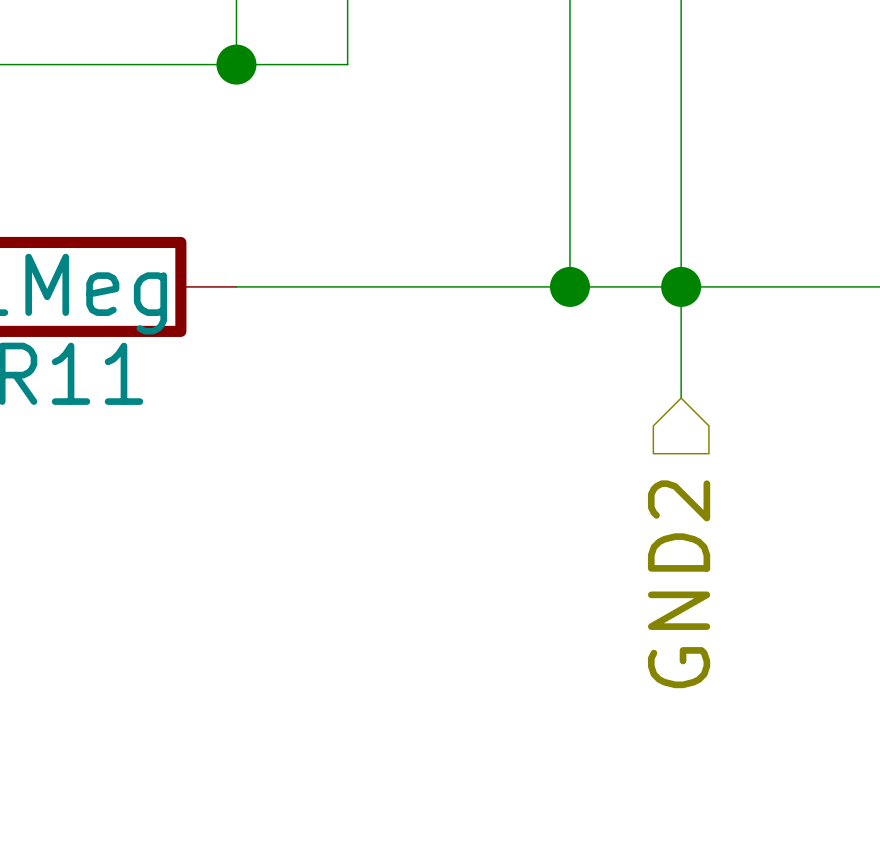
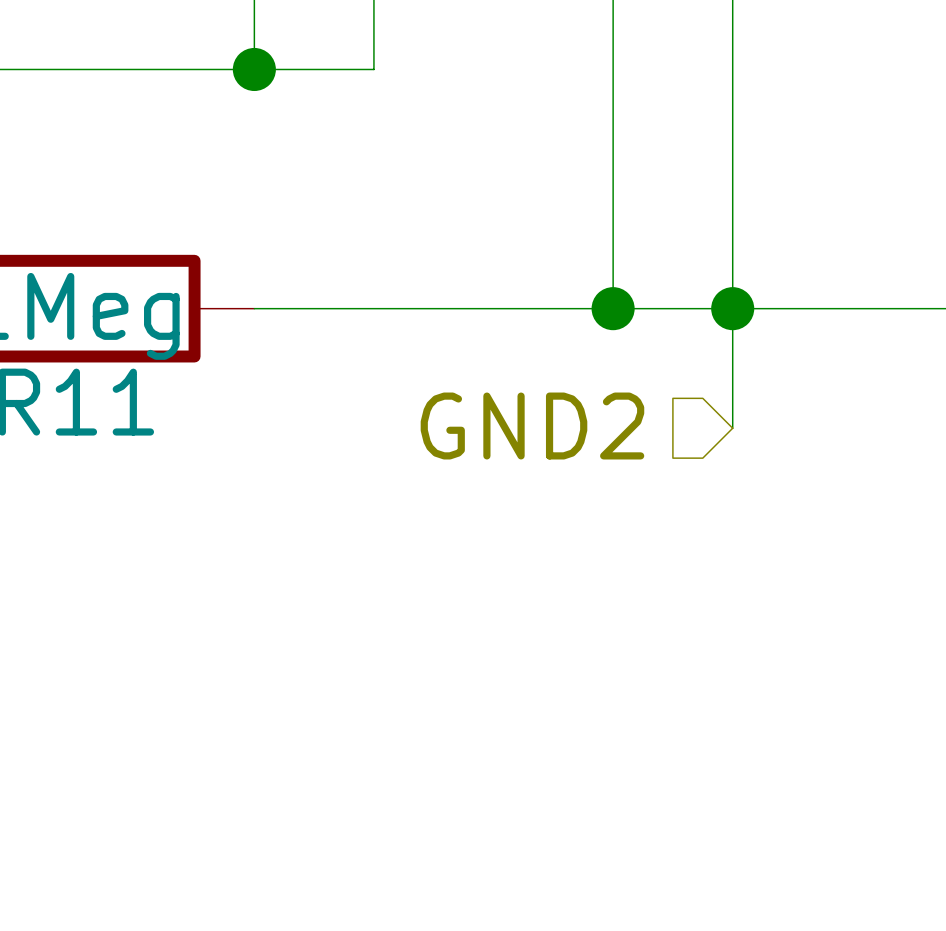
hierarchical label rotation: 0° (679, 584) -> 90° clockwise (532, 426)
hierarchical label position: GND2 (679, 584) -> GND2 (532, 426)

